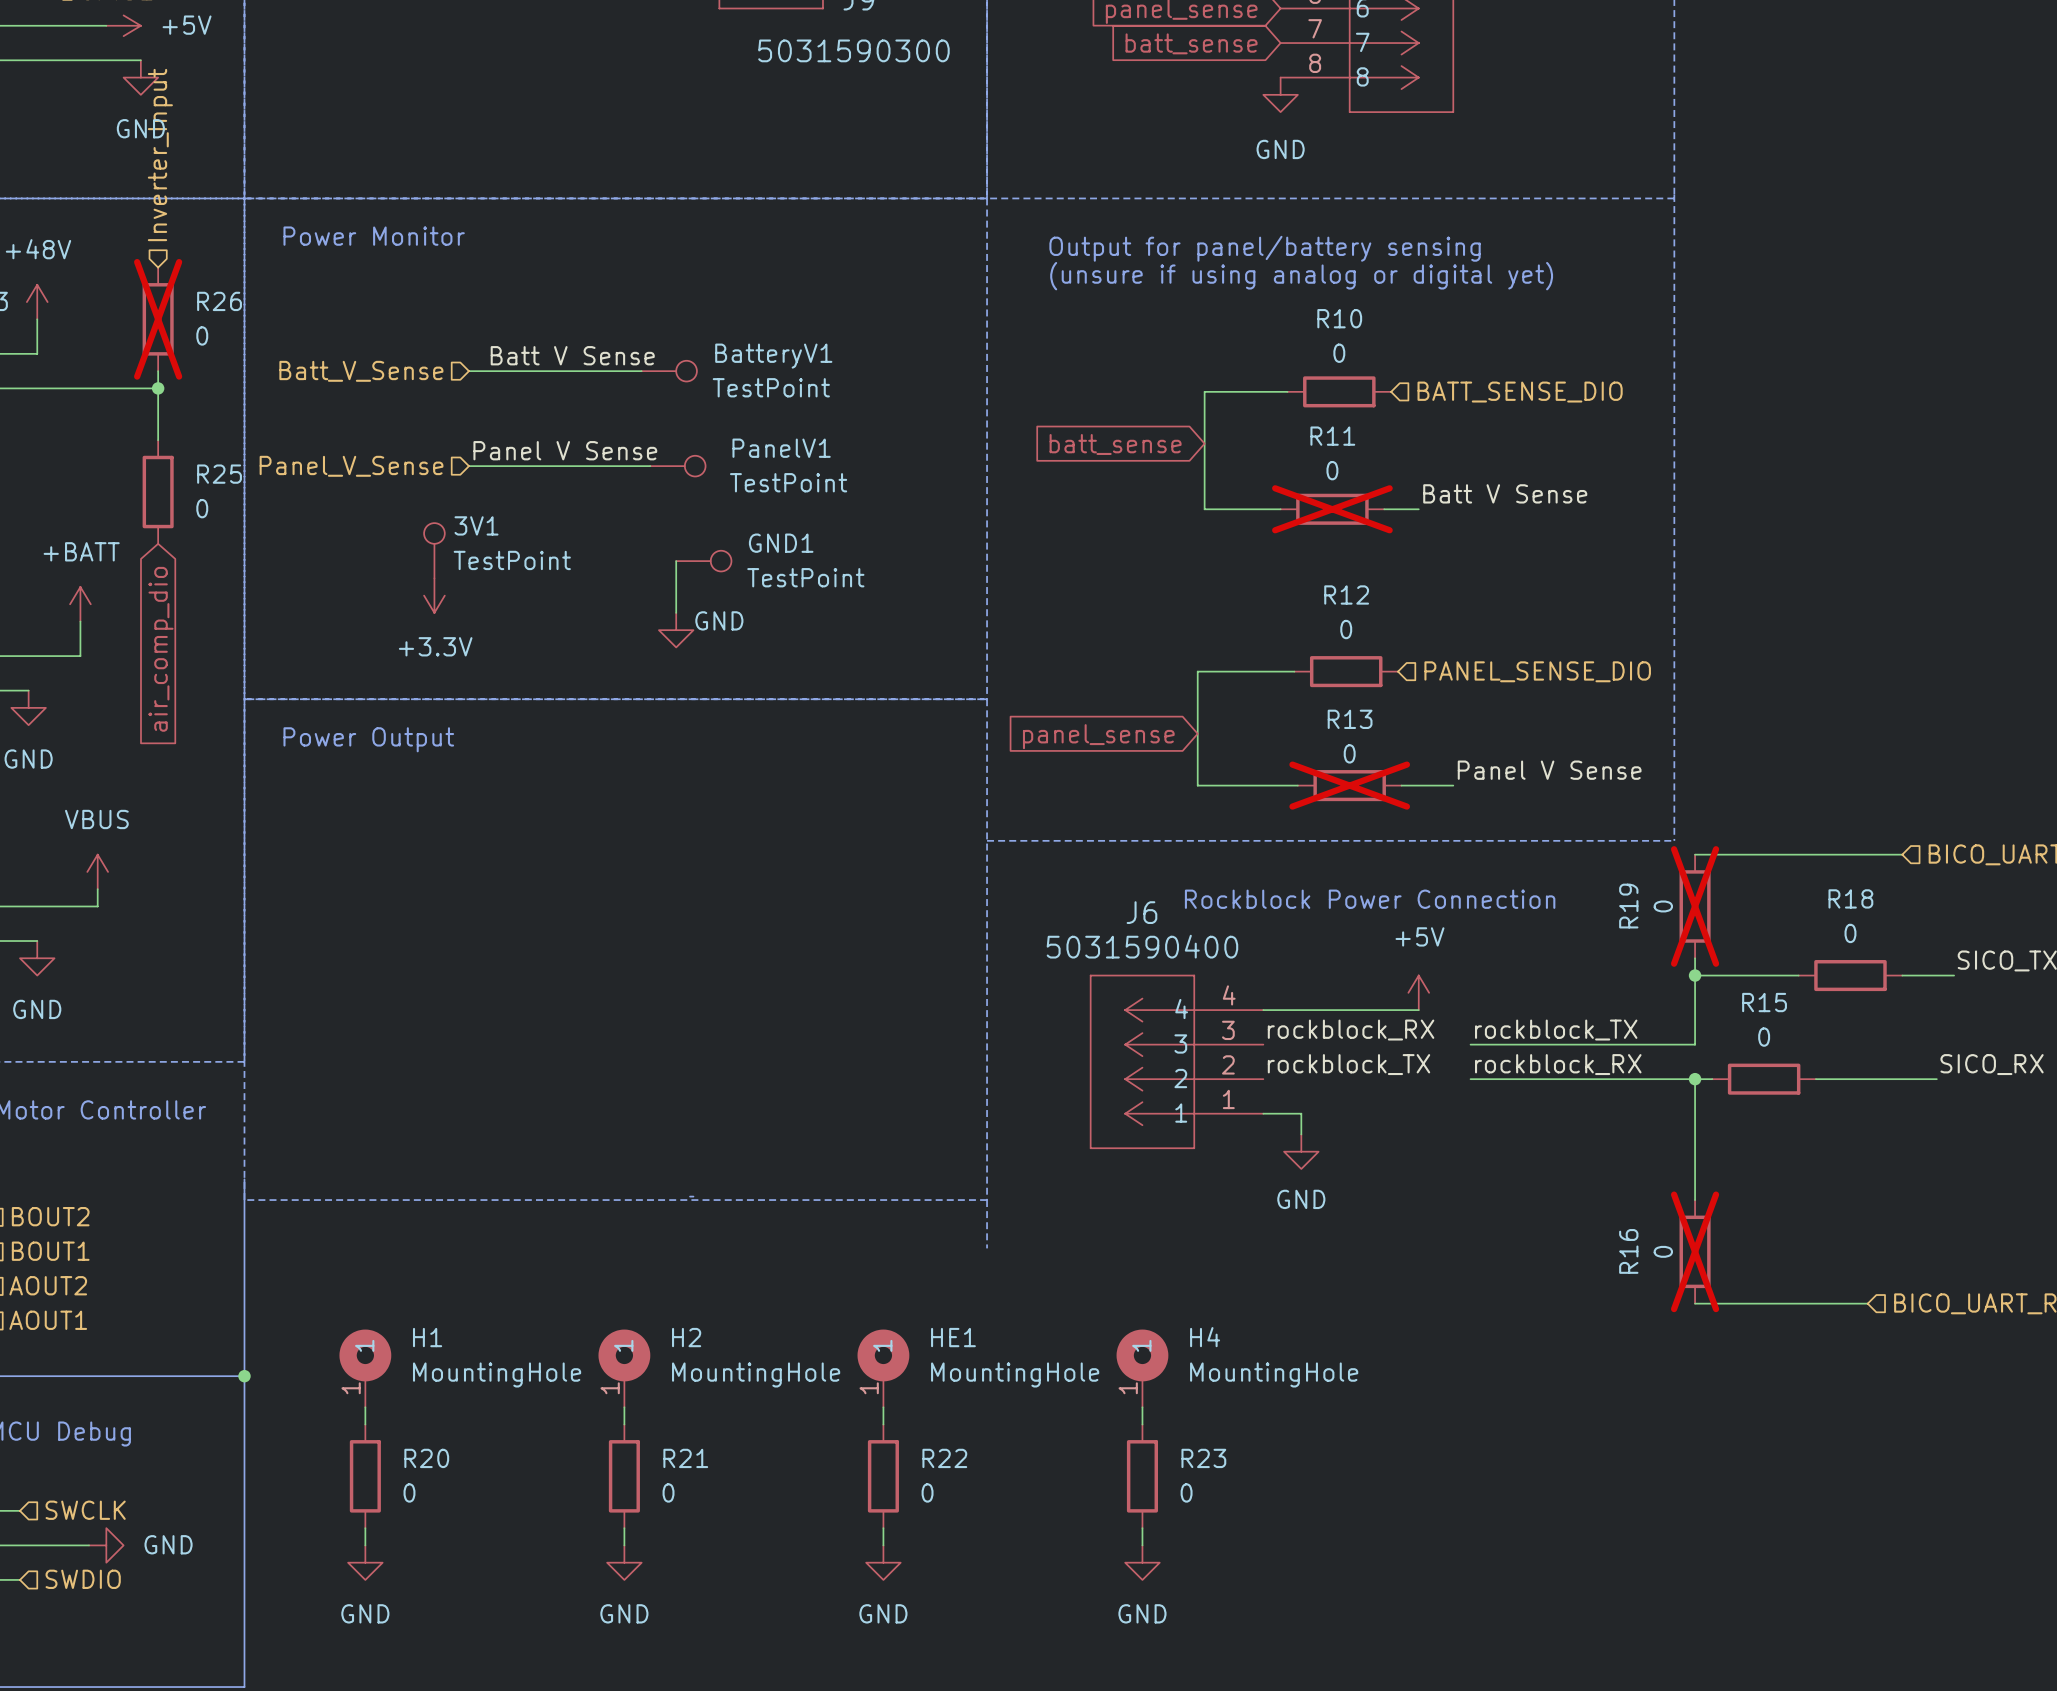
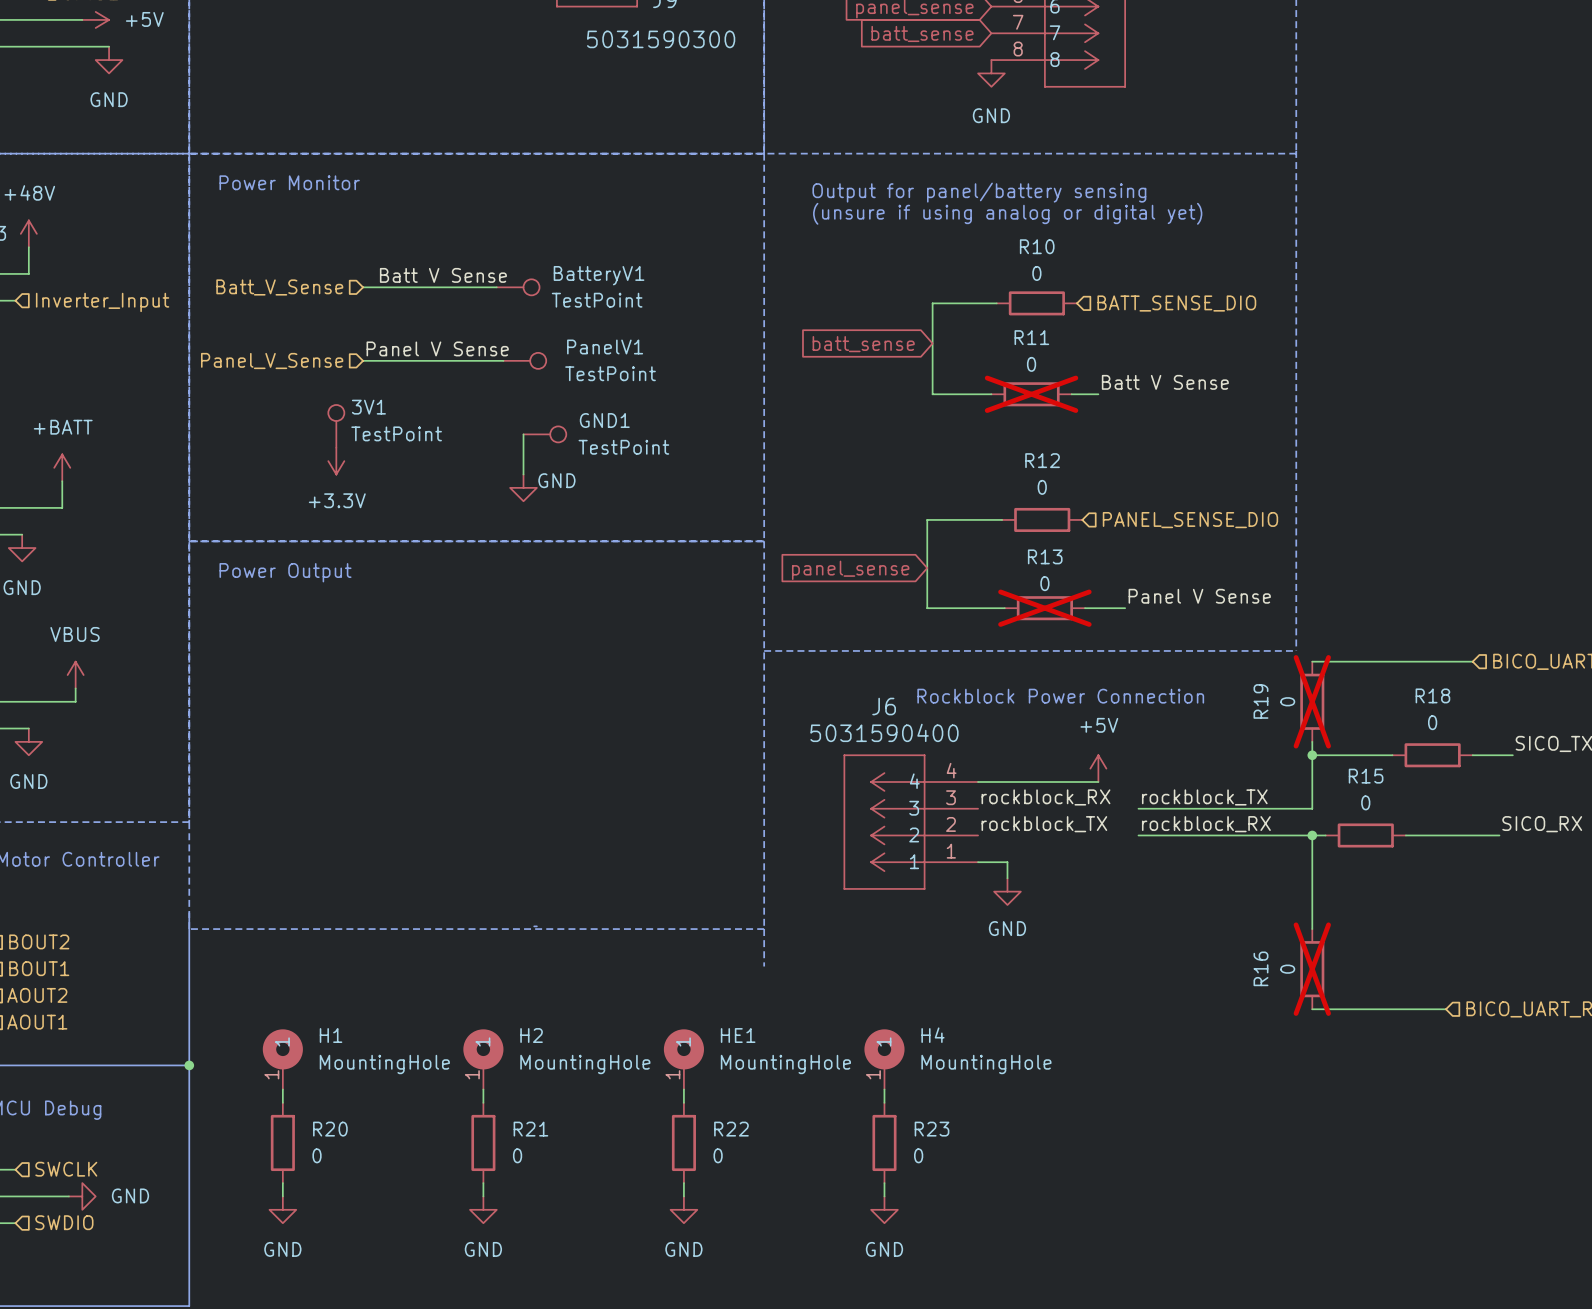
hierarchical label rotation: 0° (160, 155) -> 90° clockwise (102, 302)
hierarchical label position: Inverter_Input (160, 155) -> Inverter_Input (102, 302)
R26: 0 (158, 319) -> none
wire: (158, 371) (158, 440) -> none
wire: (19, 388) (158, 388) -> none
junction: (158, 388) -> none
R25: 0 (158, 492) -> none
global label: air_comp_dio (161, 649) -> none

